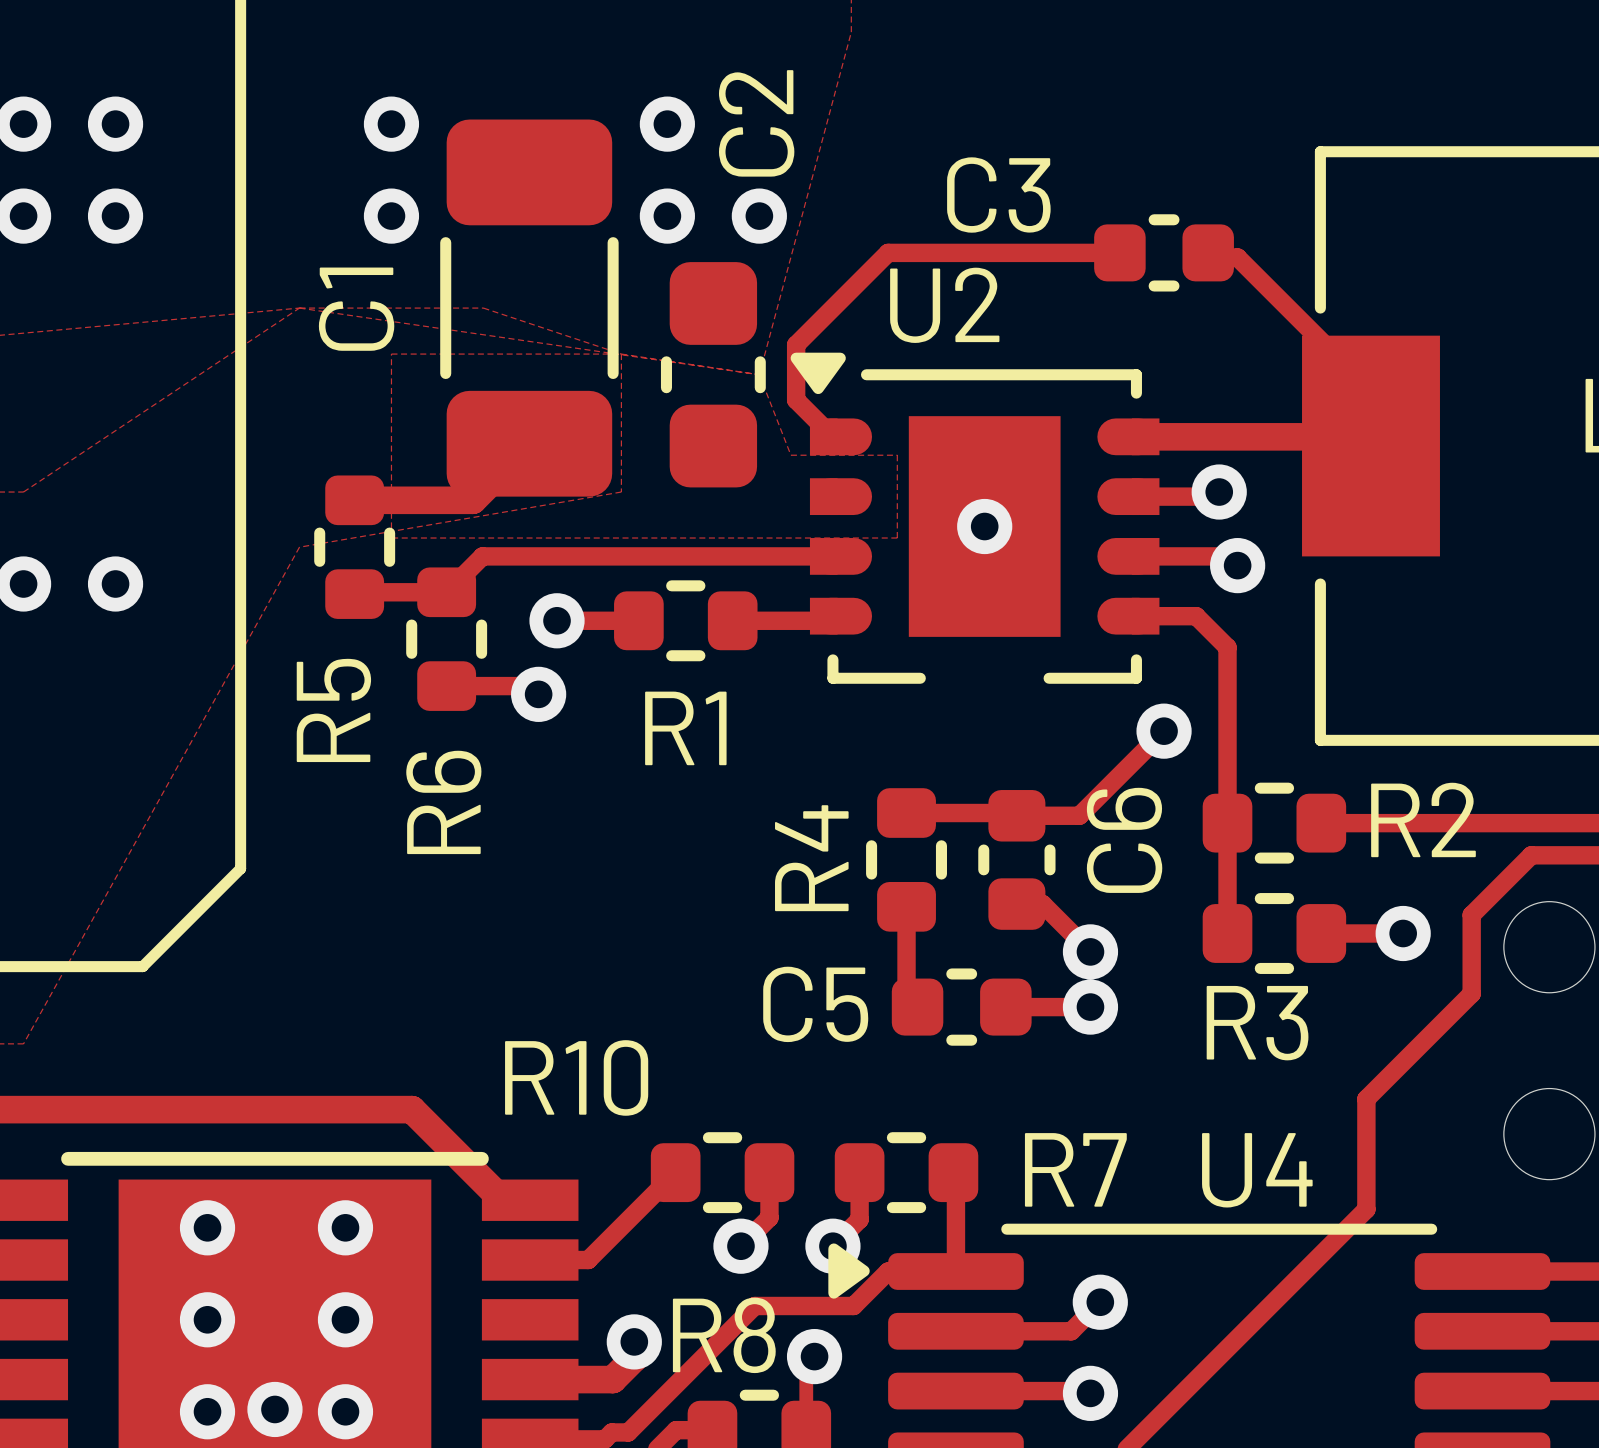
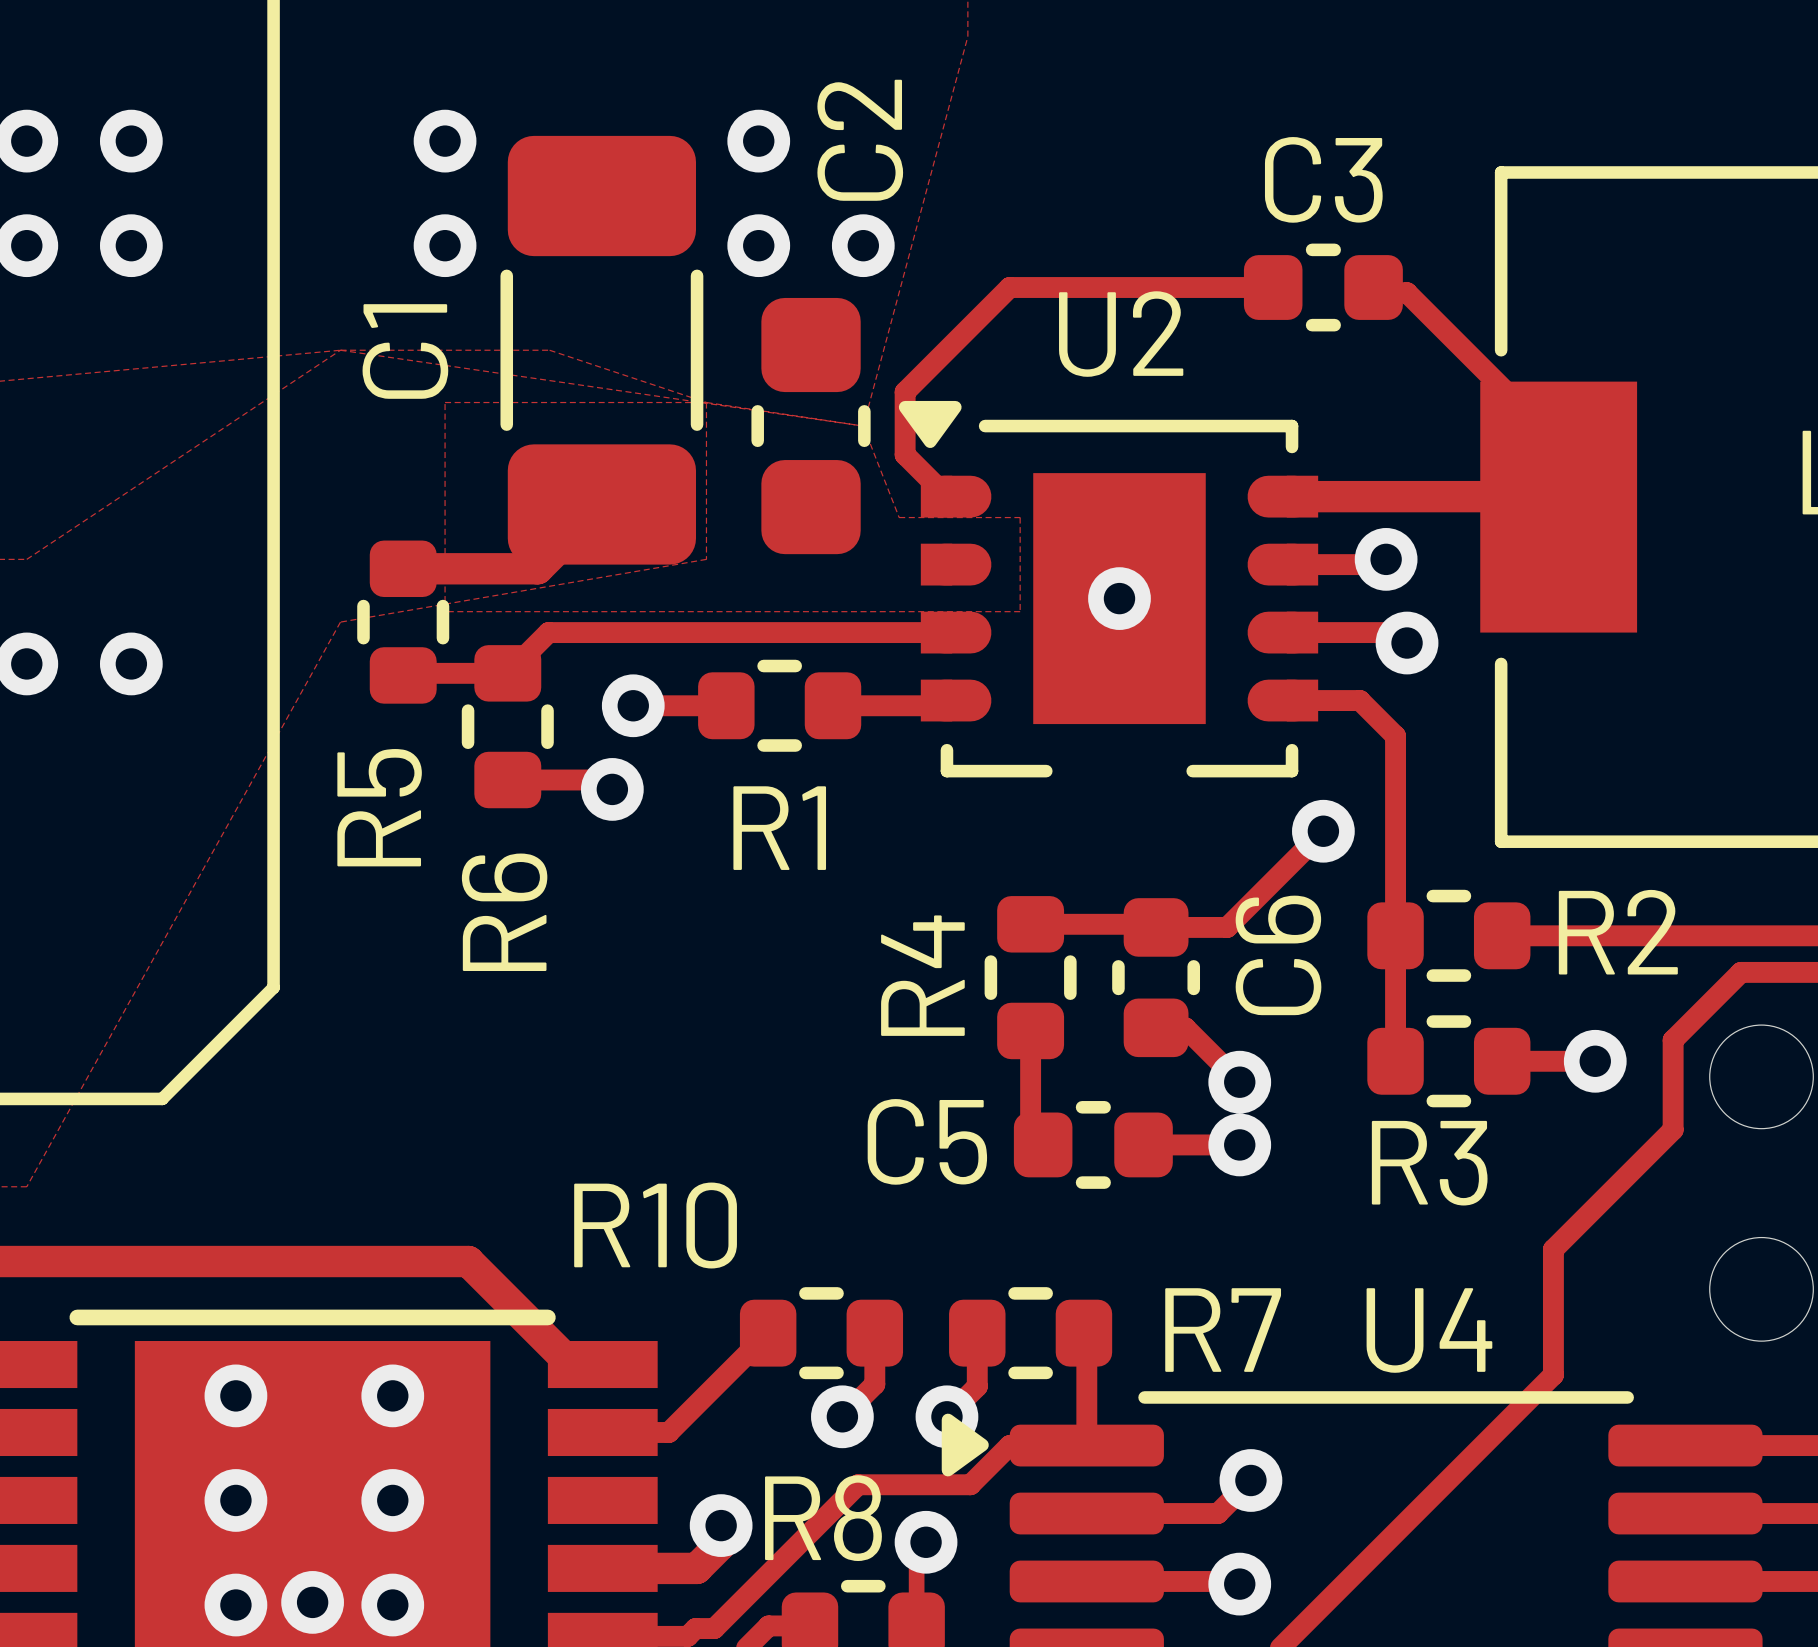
C3 name position: C3 (998, 195) -> C3 (1323, 179)
U2 name position: U2 (944, 305) -> U2 (1121, 334)

